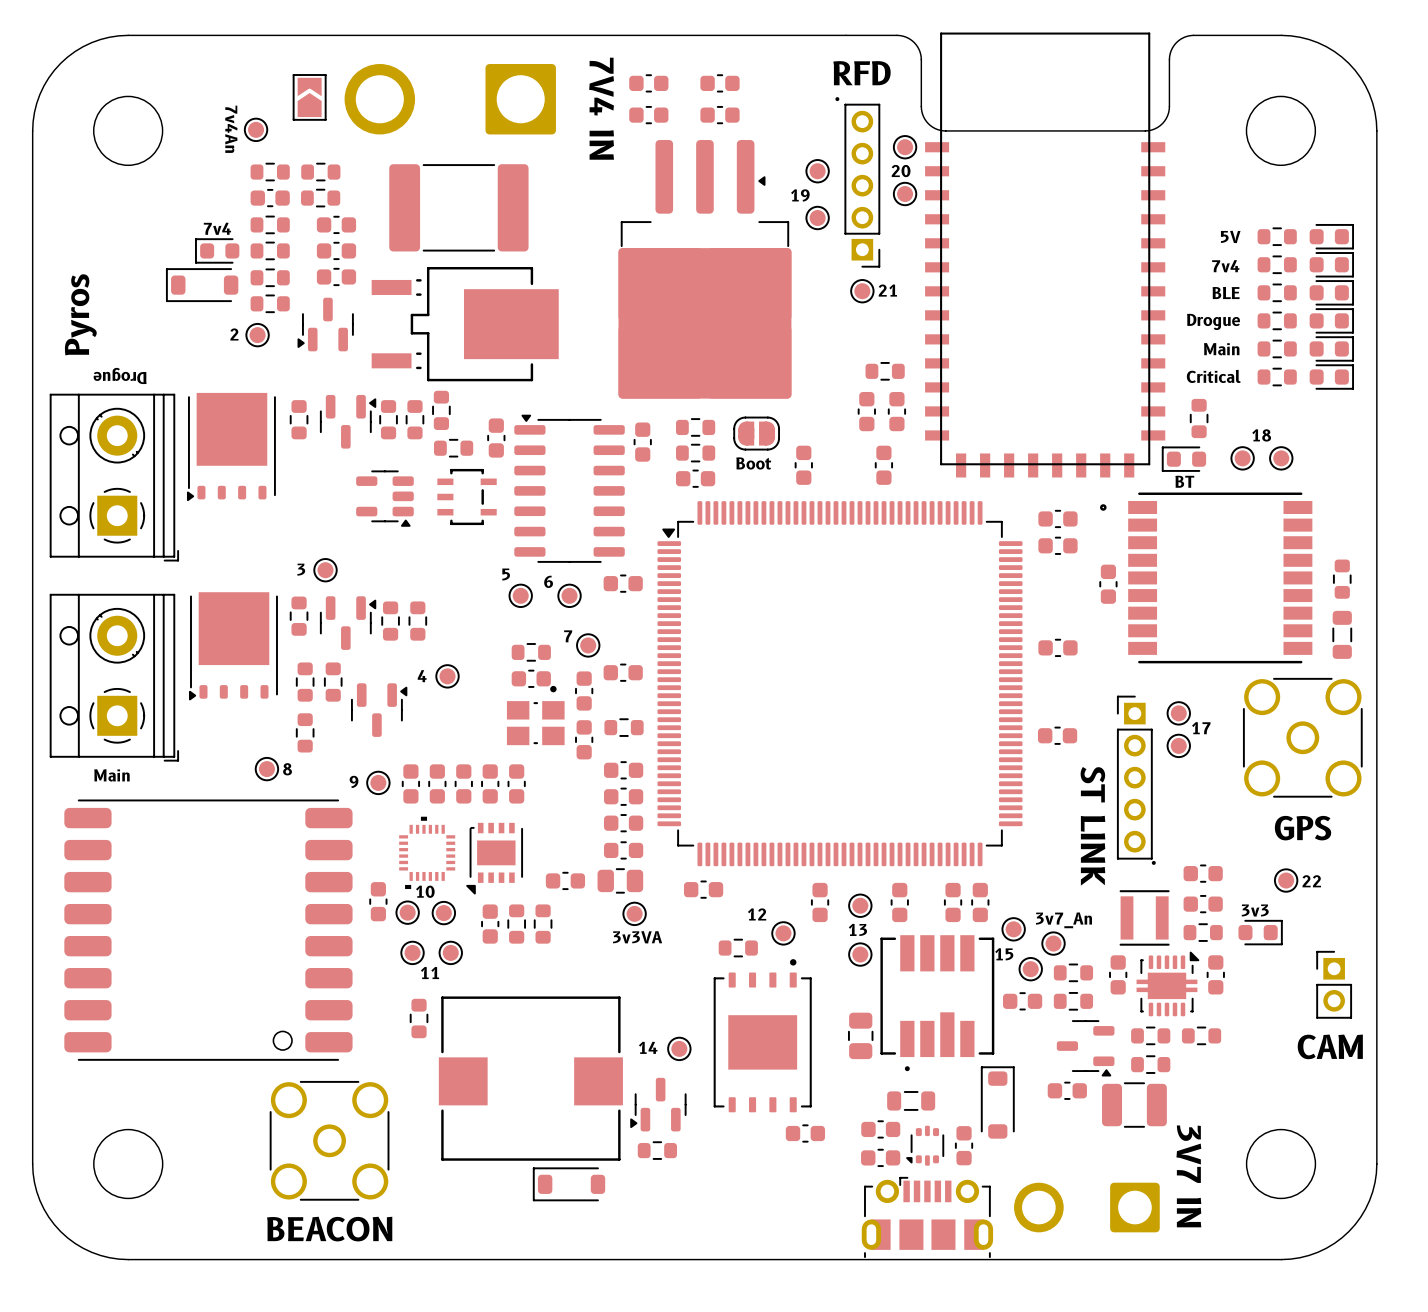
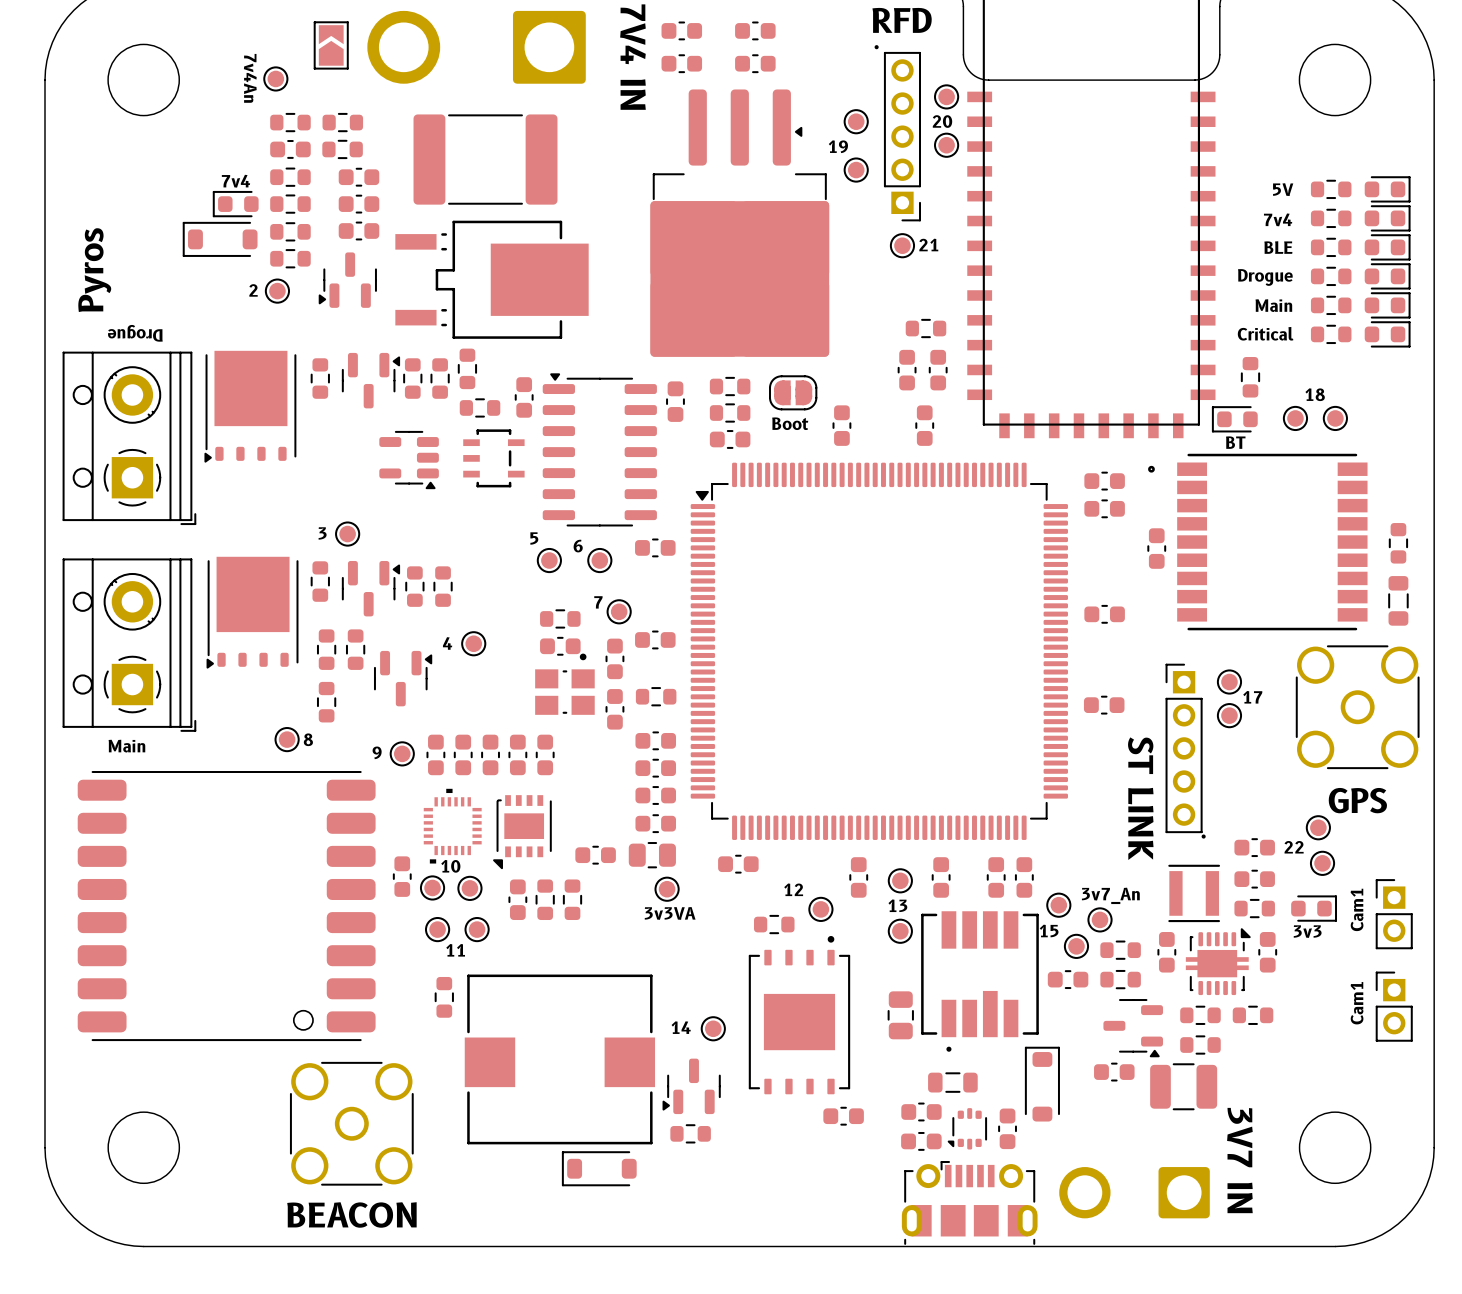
part: none -> (1318, 827)
part: (1286, 880) -> none
text position: 22 (1311, 881) -> 22 (1294, 847)
part: none -> (1322, 863)
text position: 3v3 (1255, 910) -> 3v3 (1307, 931)
text: none -> Cam1 (1357, 909)
part: none -> (1394, 914)
part: (1334, 984) -> none
text: none -> Cam1 (1357, 1003)
part: none -> (1394, 1006)
text: CAM (1330, 1046) -> none

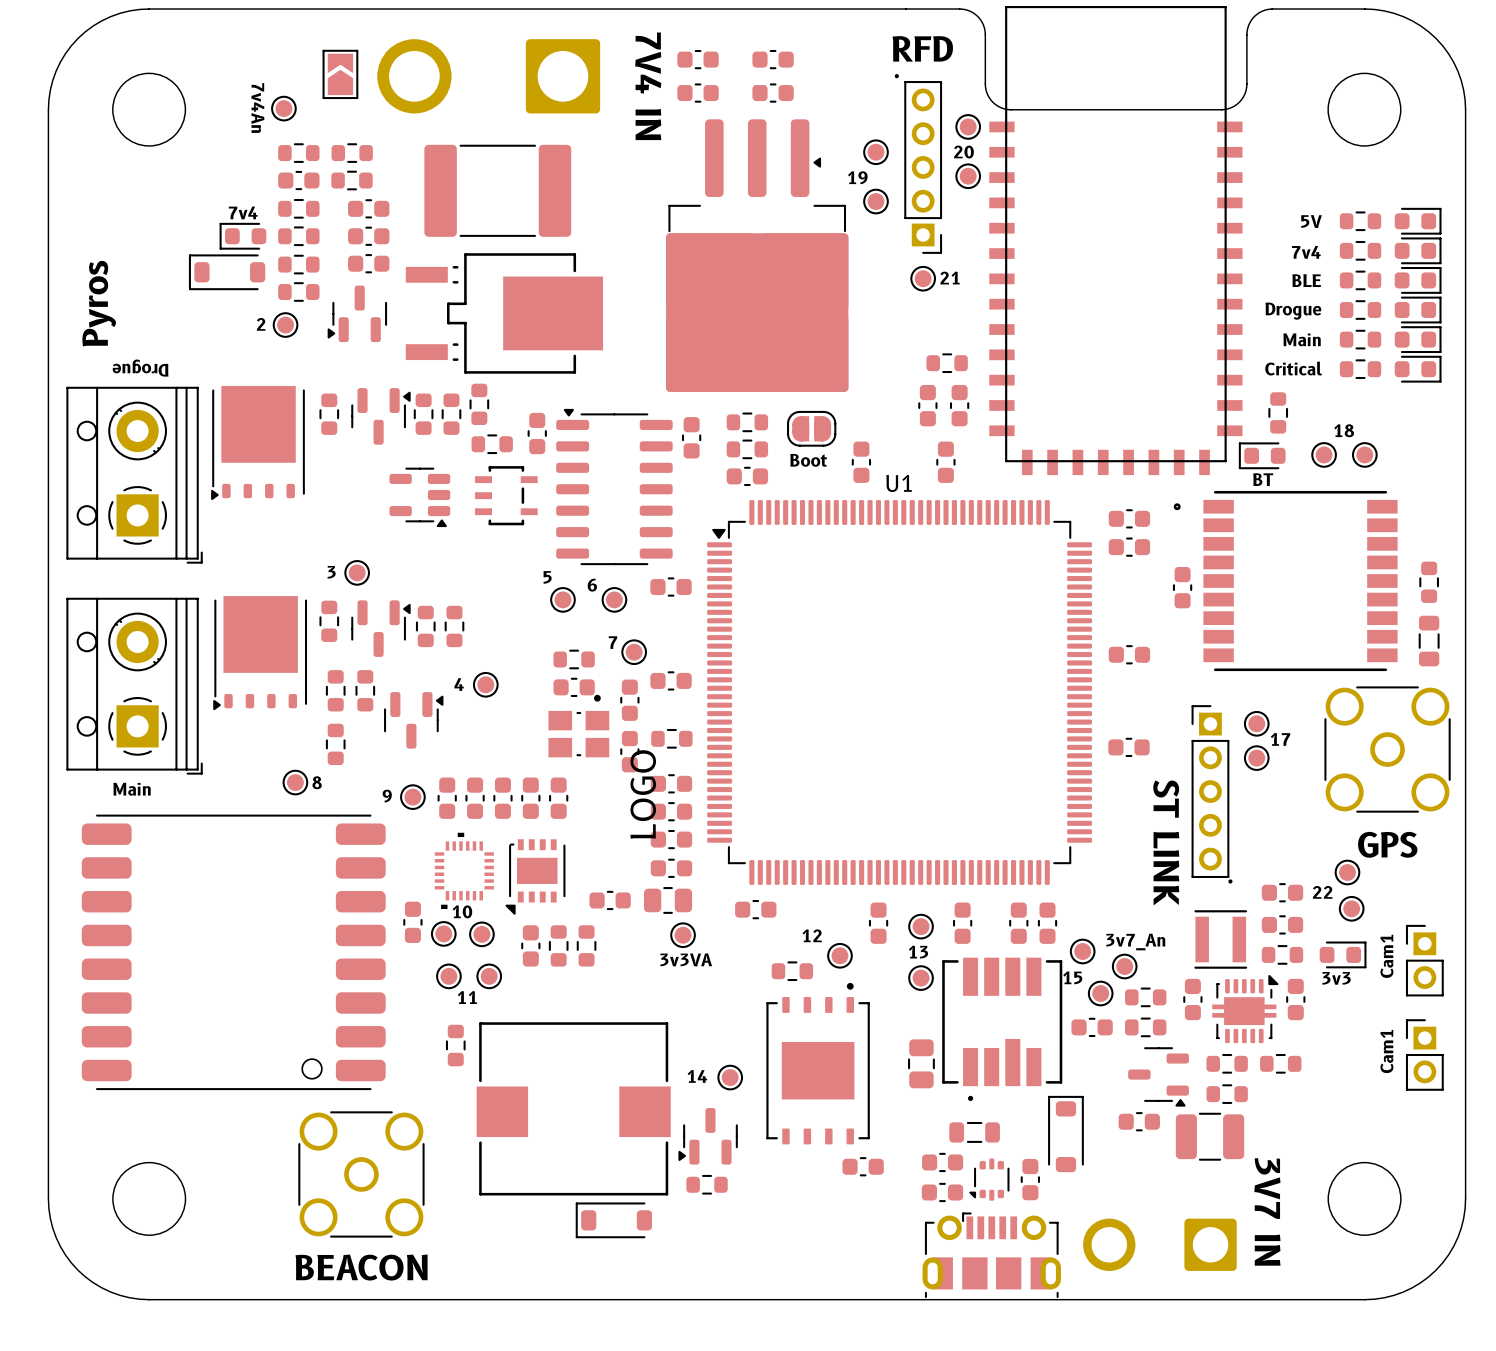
U1 name: none -> U1 (899, 483)
drawing: none -> [630, 750, 657, 839]

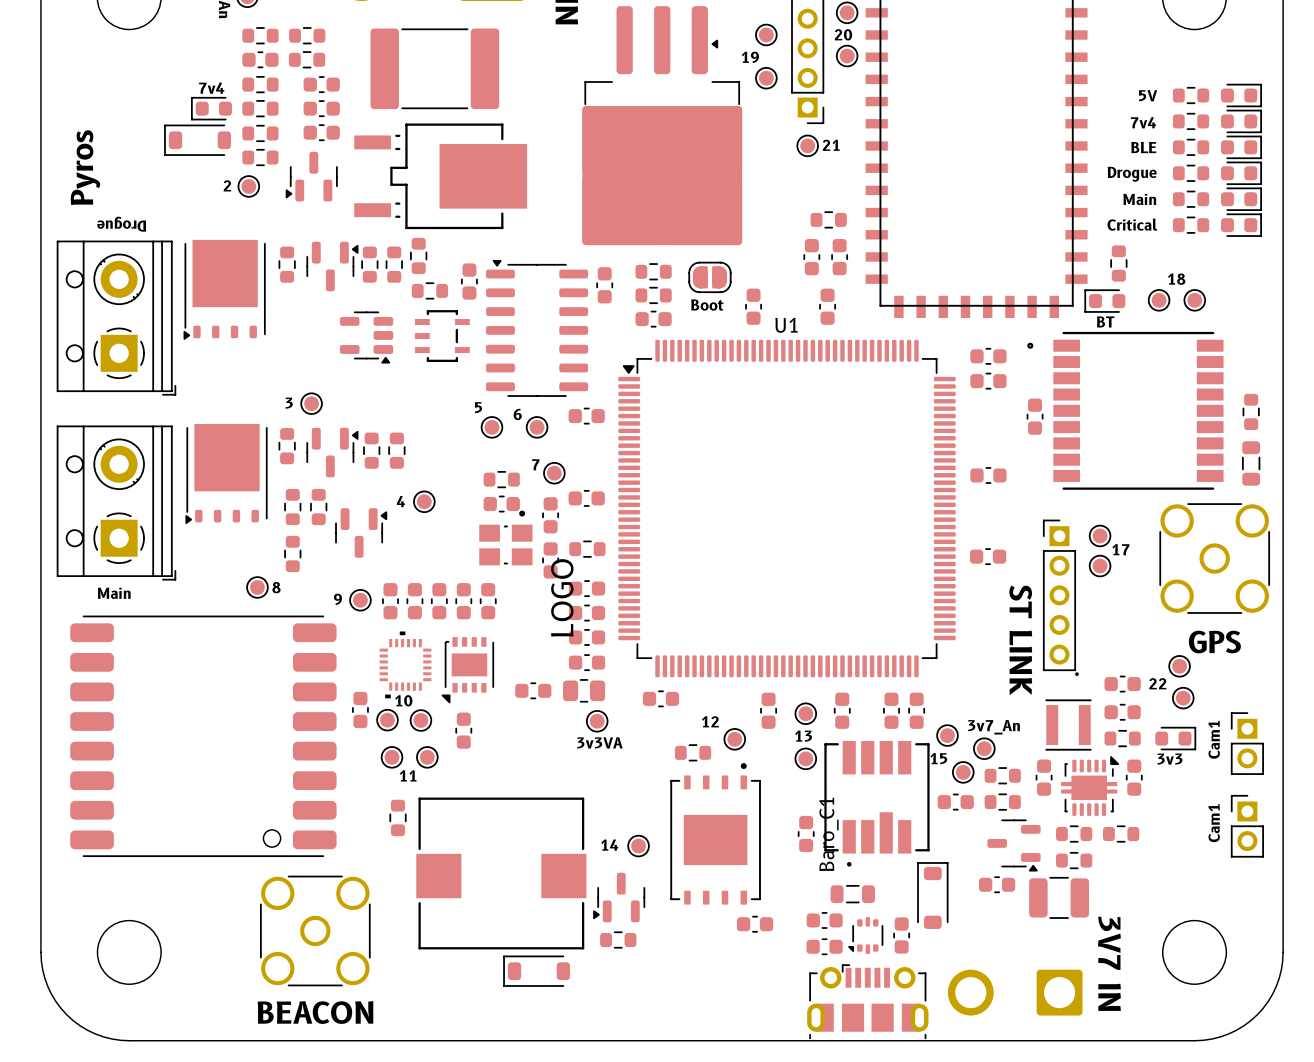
part: (558, 945) -> none
part: (586, 945) -> none
part: (921, 1063) -> none
Baro_C1: none -> (806, 834)

